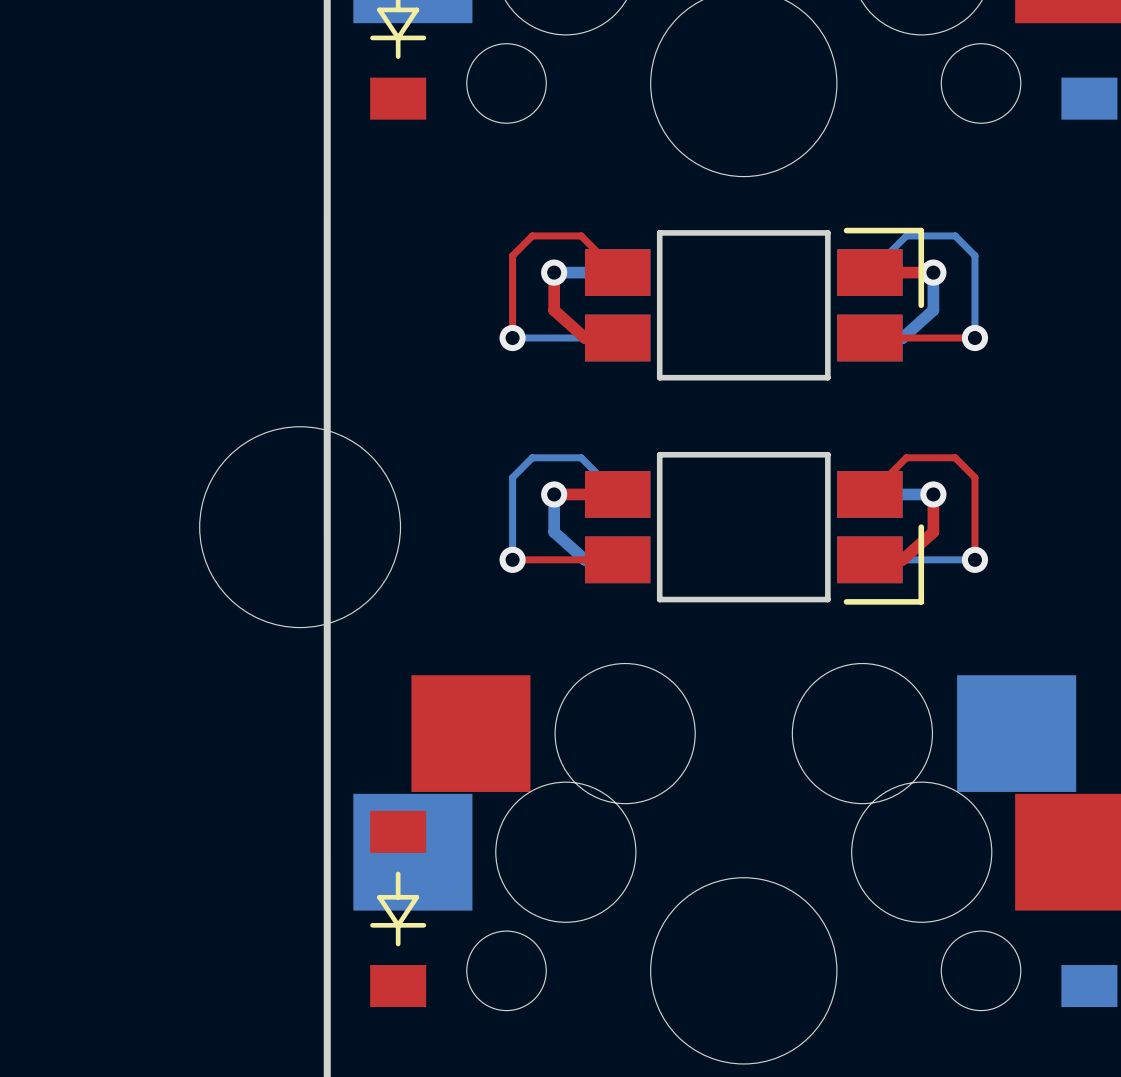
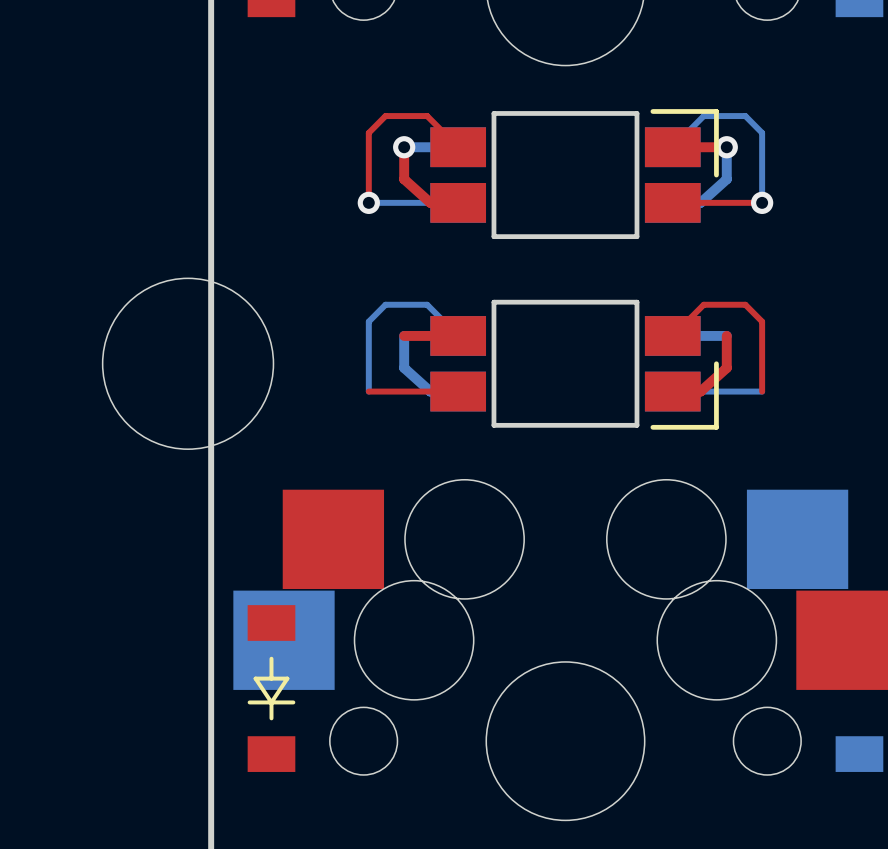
via: (554, 494) -> none
via: (933, 494) -> none
via: (512, 559) -> none
via: (974, 559) -> none

